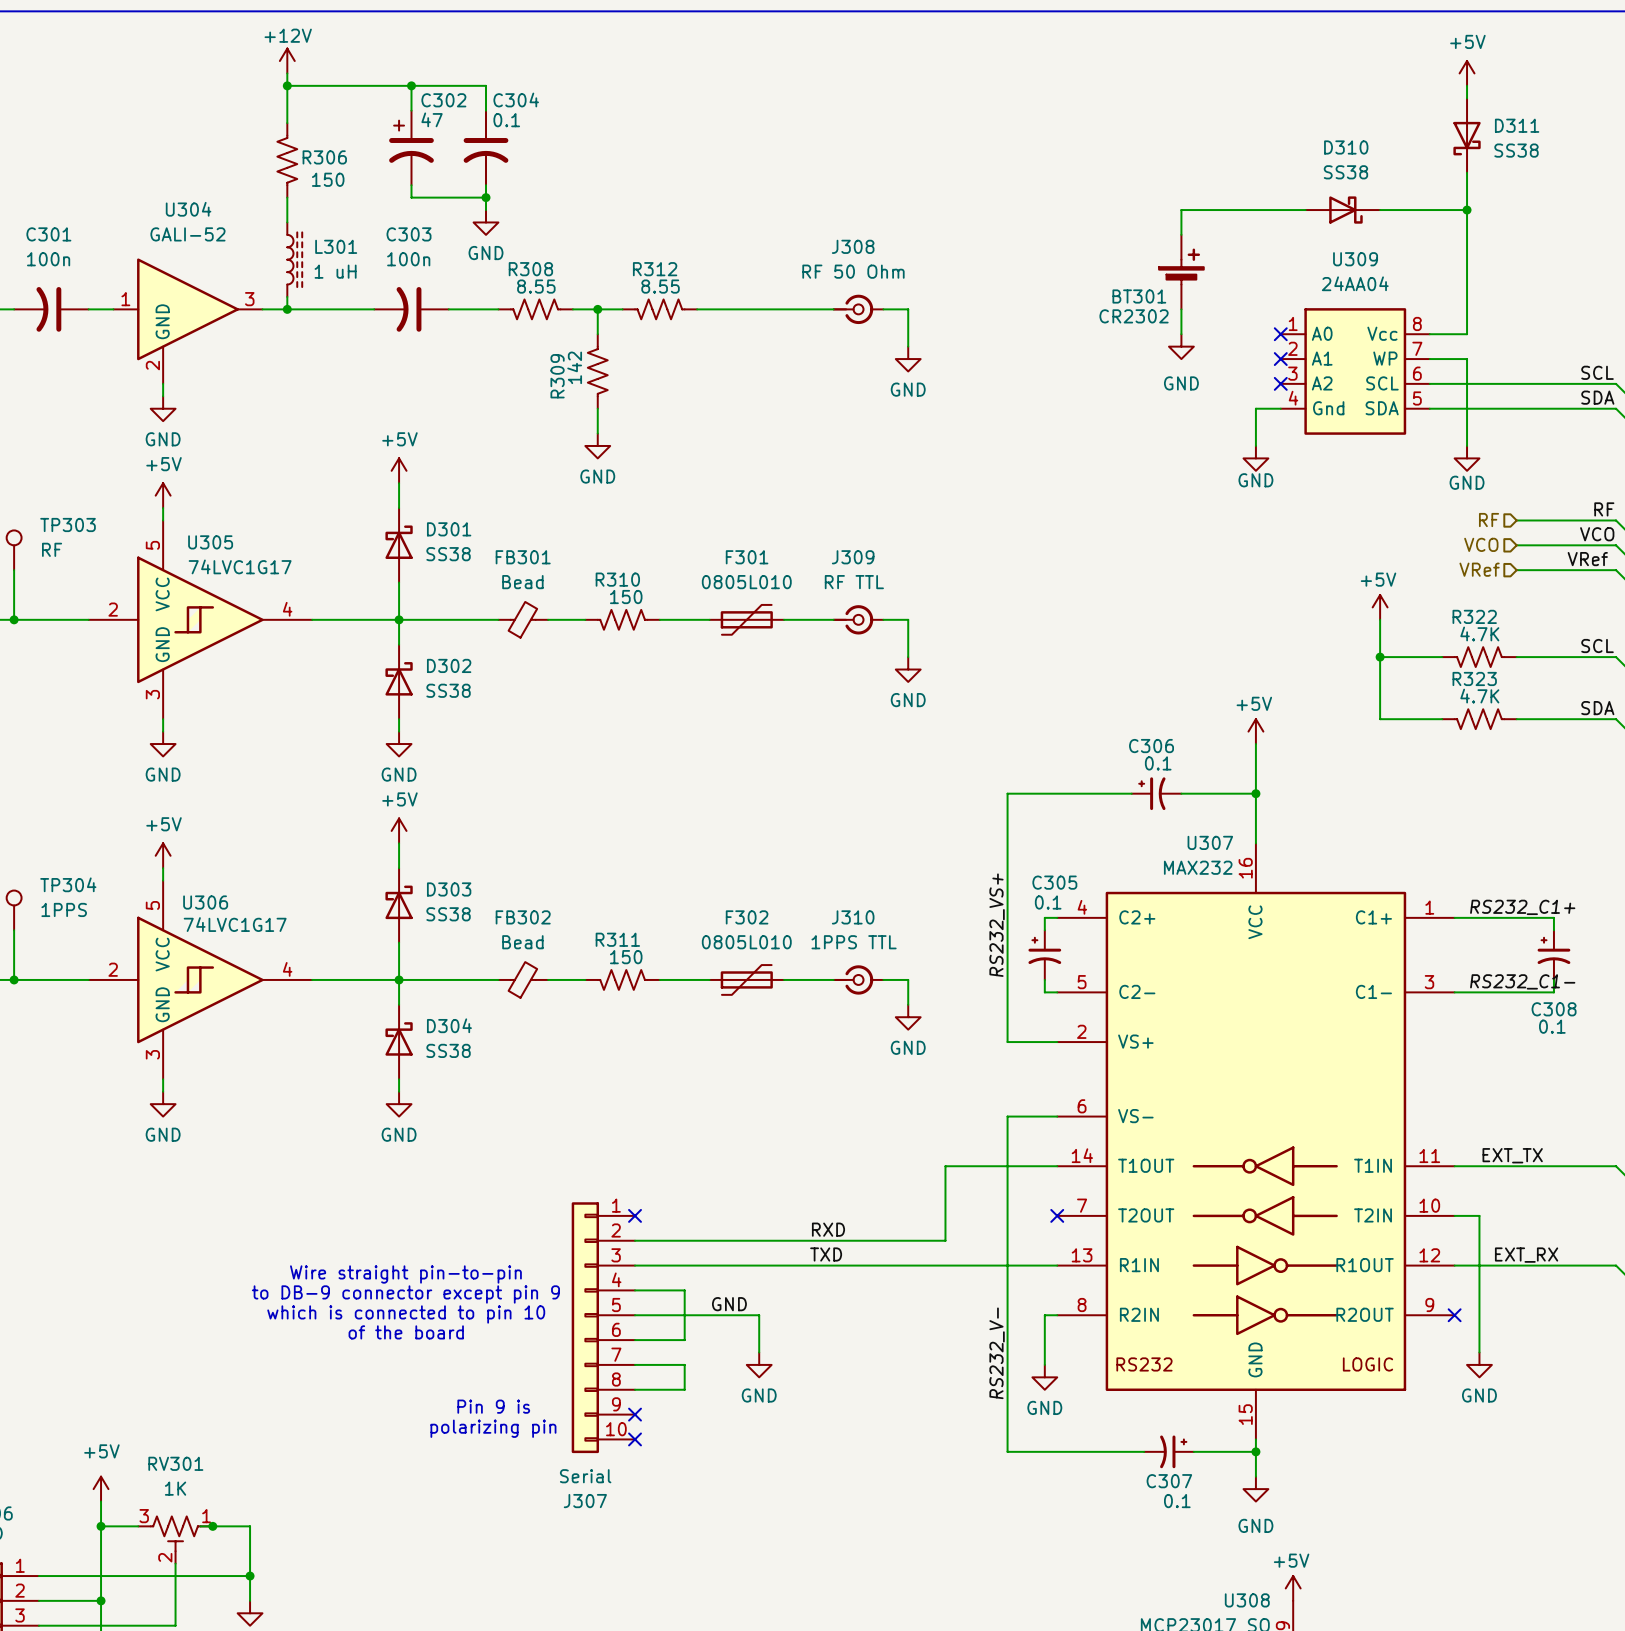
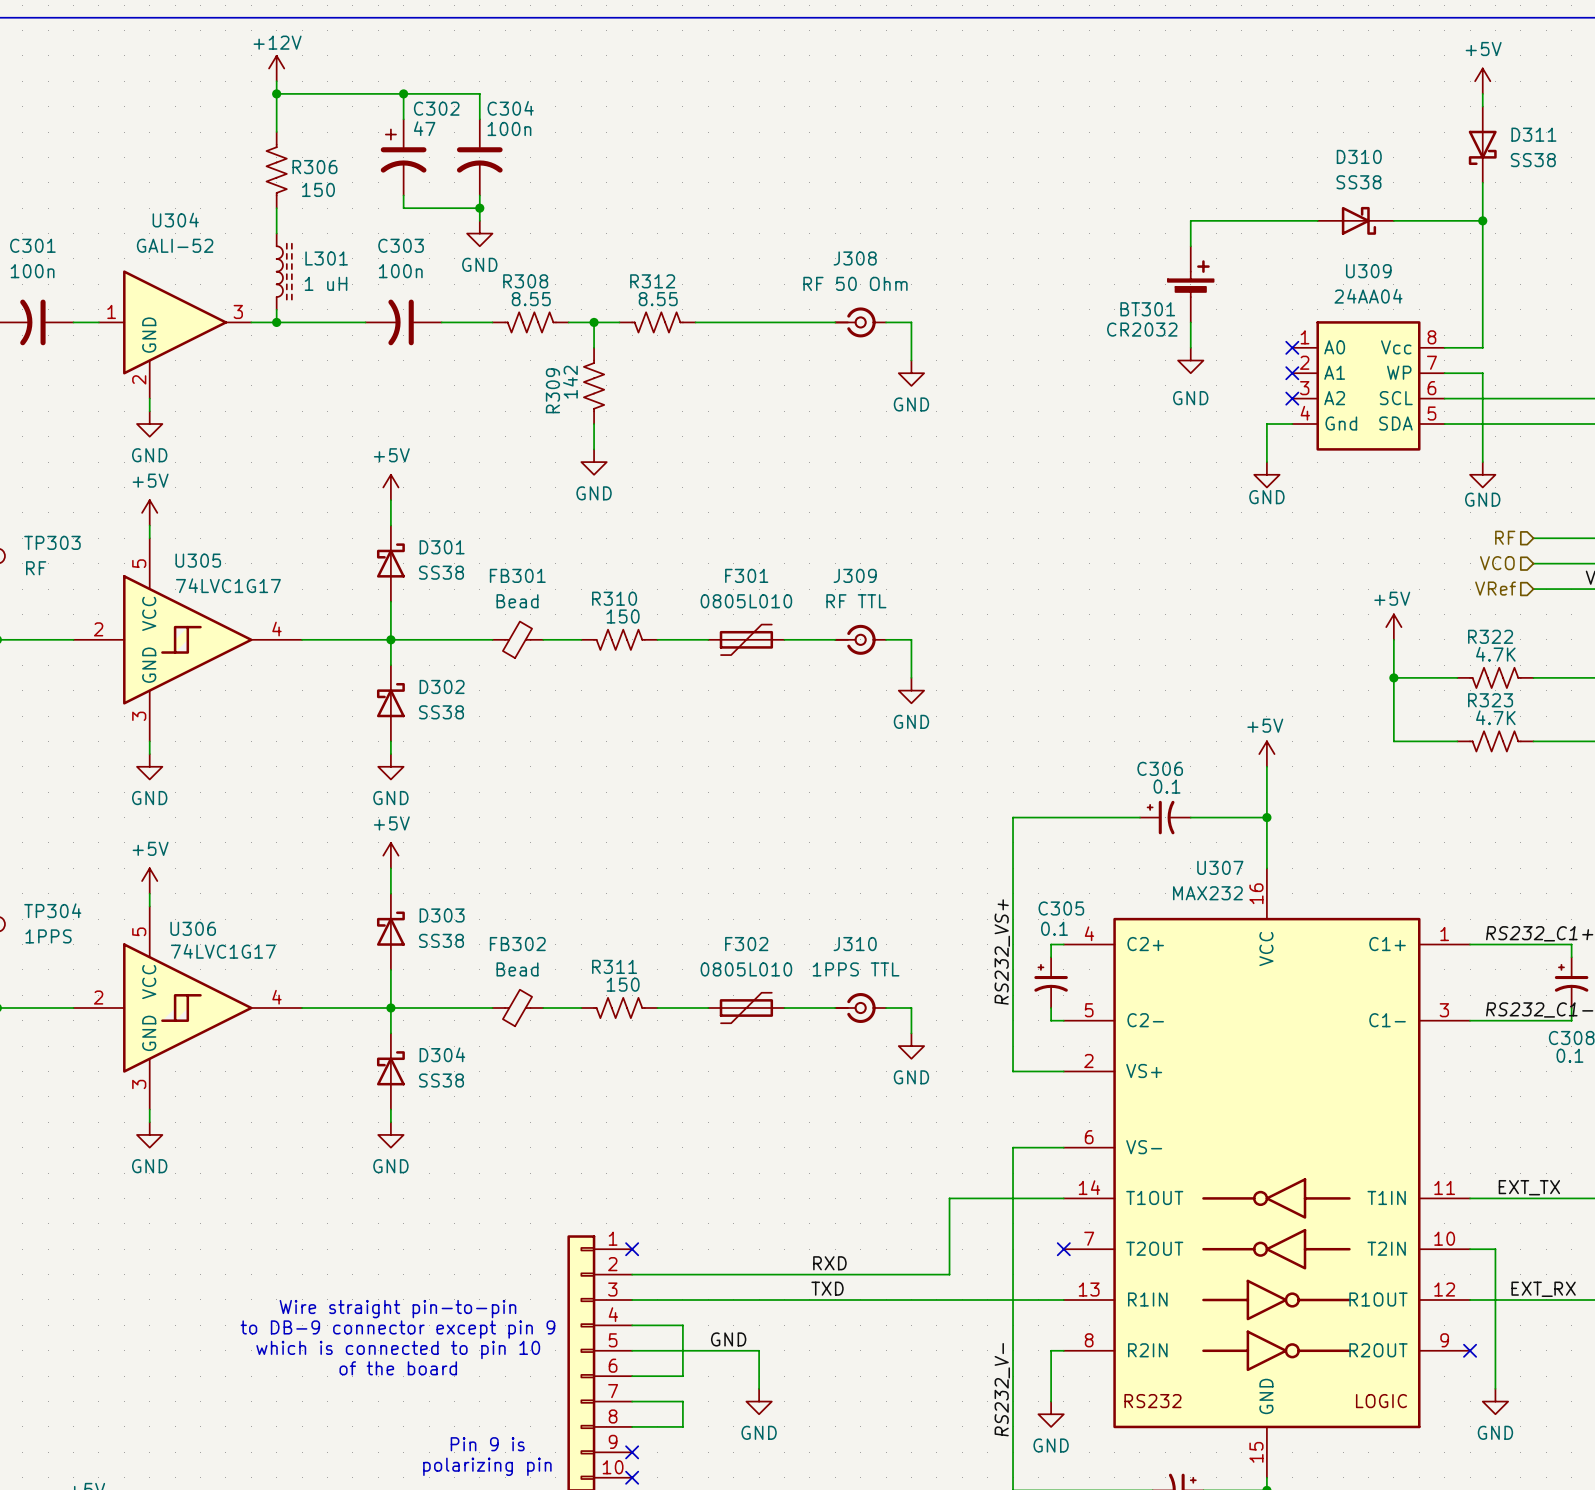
C304 value: 0.1 (506, 120) -> 100n (509, 128)
BT301 value: CR2302 (1134, 316) -> CR2032 (1142, 329)

